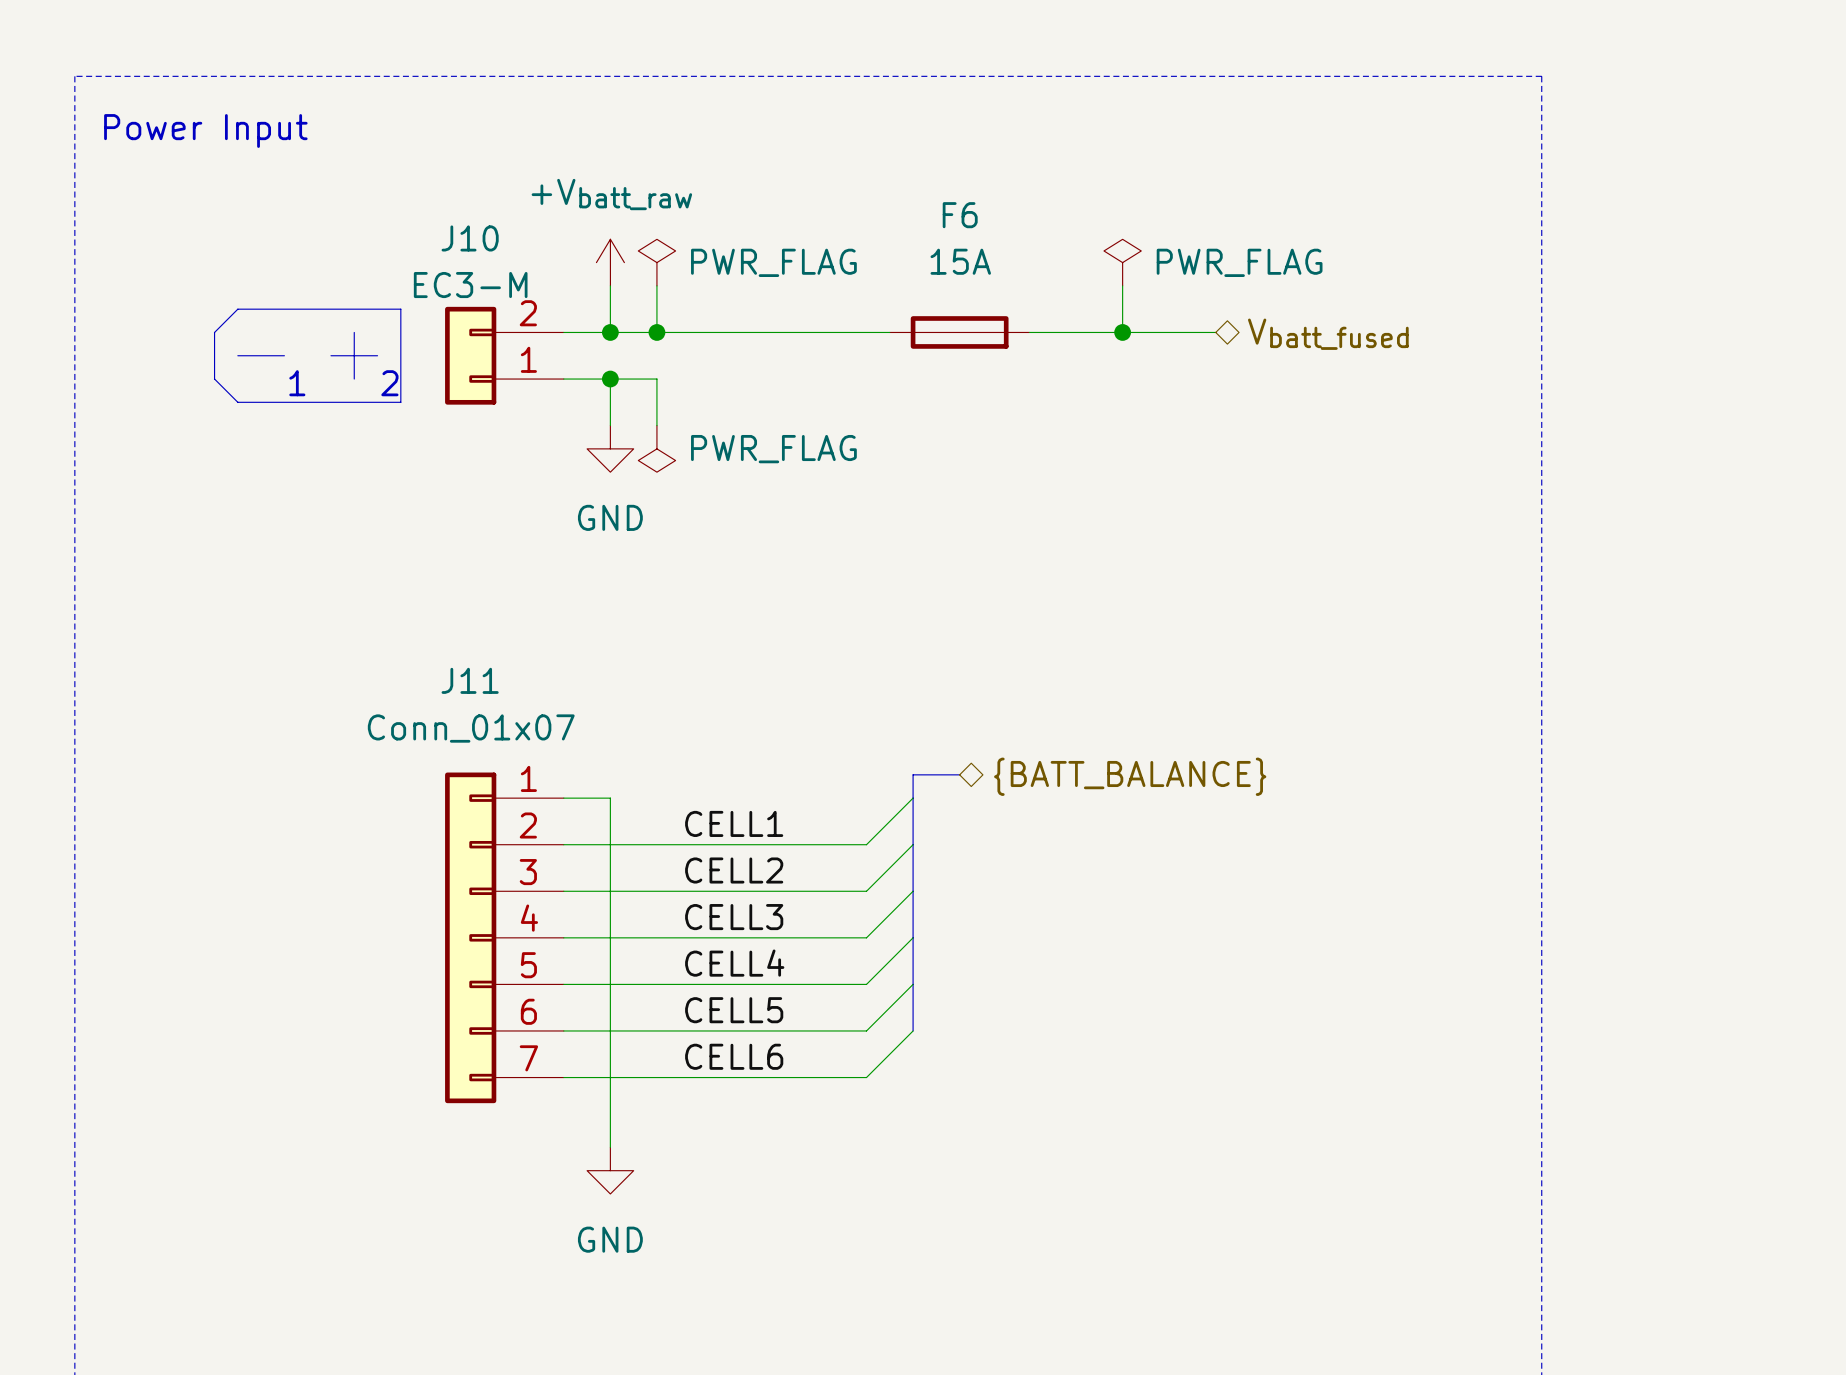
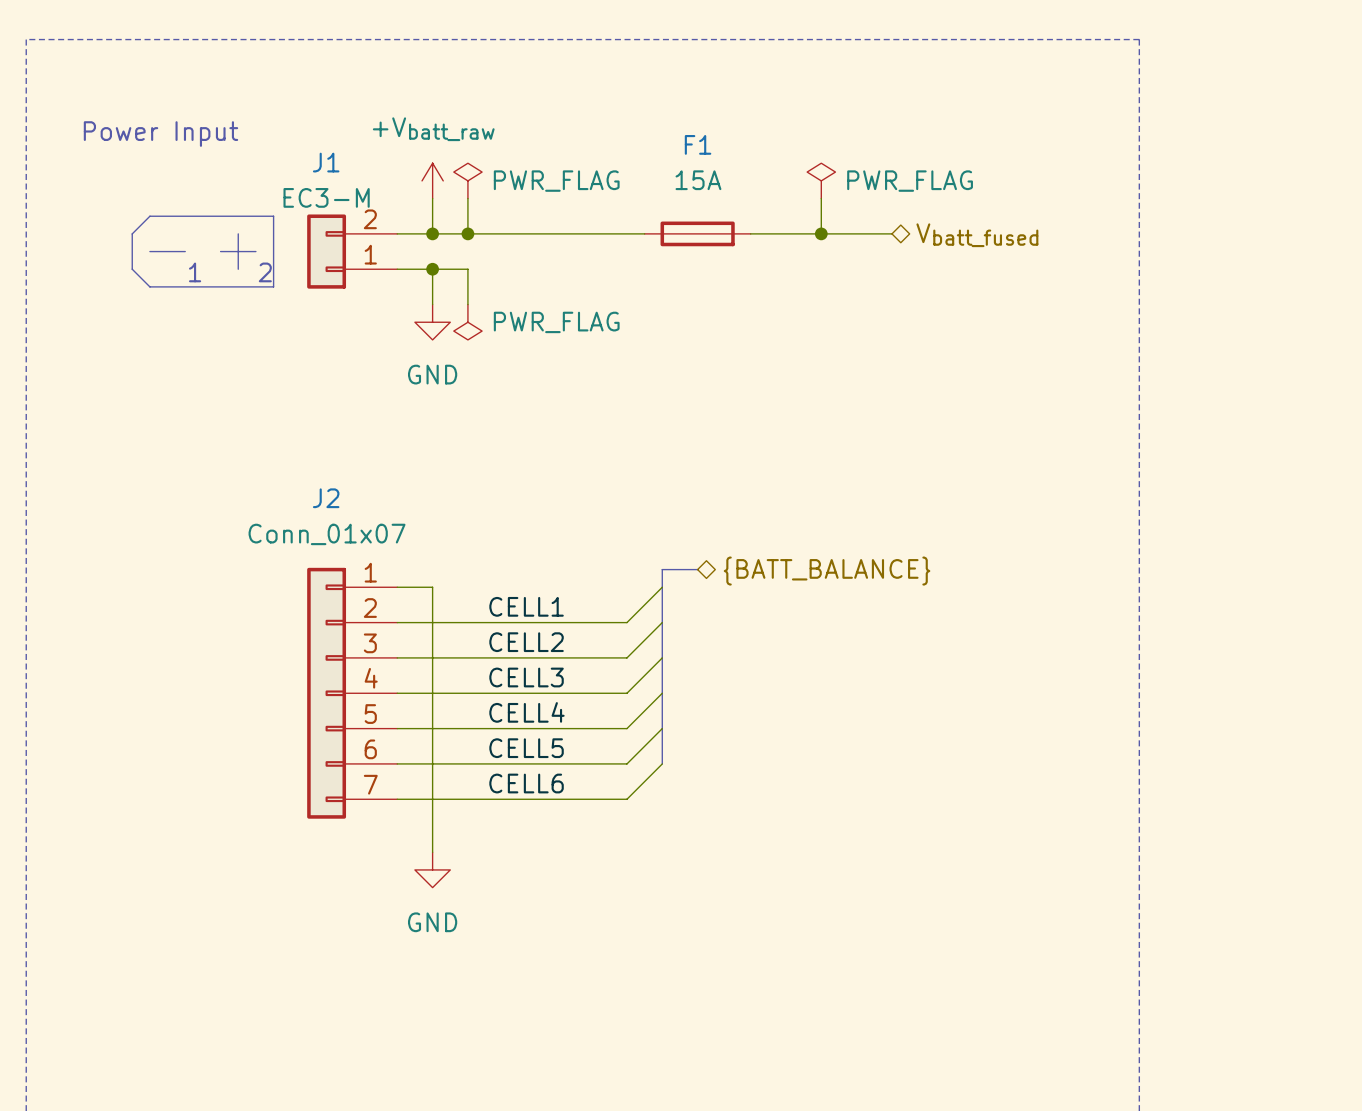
text position: Power Input (205, 131) -> Power Input (160, 134)
F6 name: F6 (960, 215) -> F1 (698, 144)
J10 name: J10 (470, 238) -> J1 (326, 162)
J11 name: J11 (470, 680) -> J2 (326, 498)

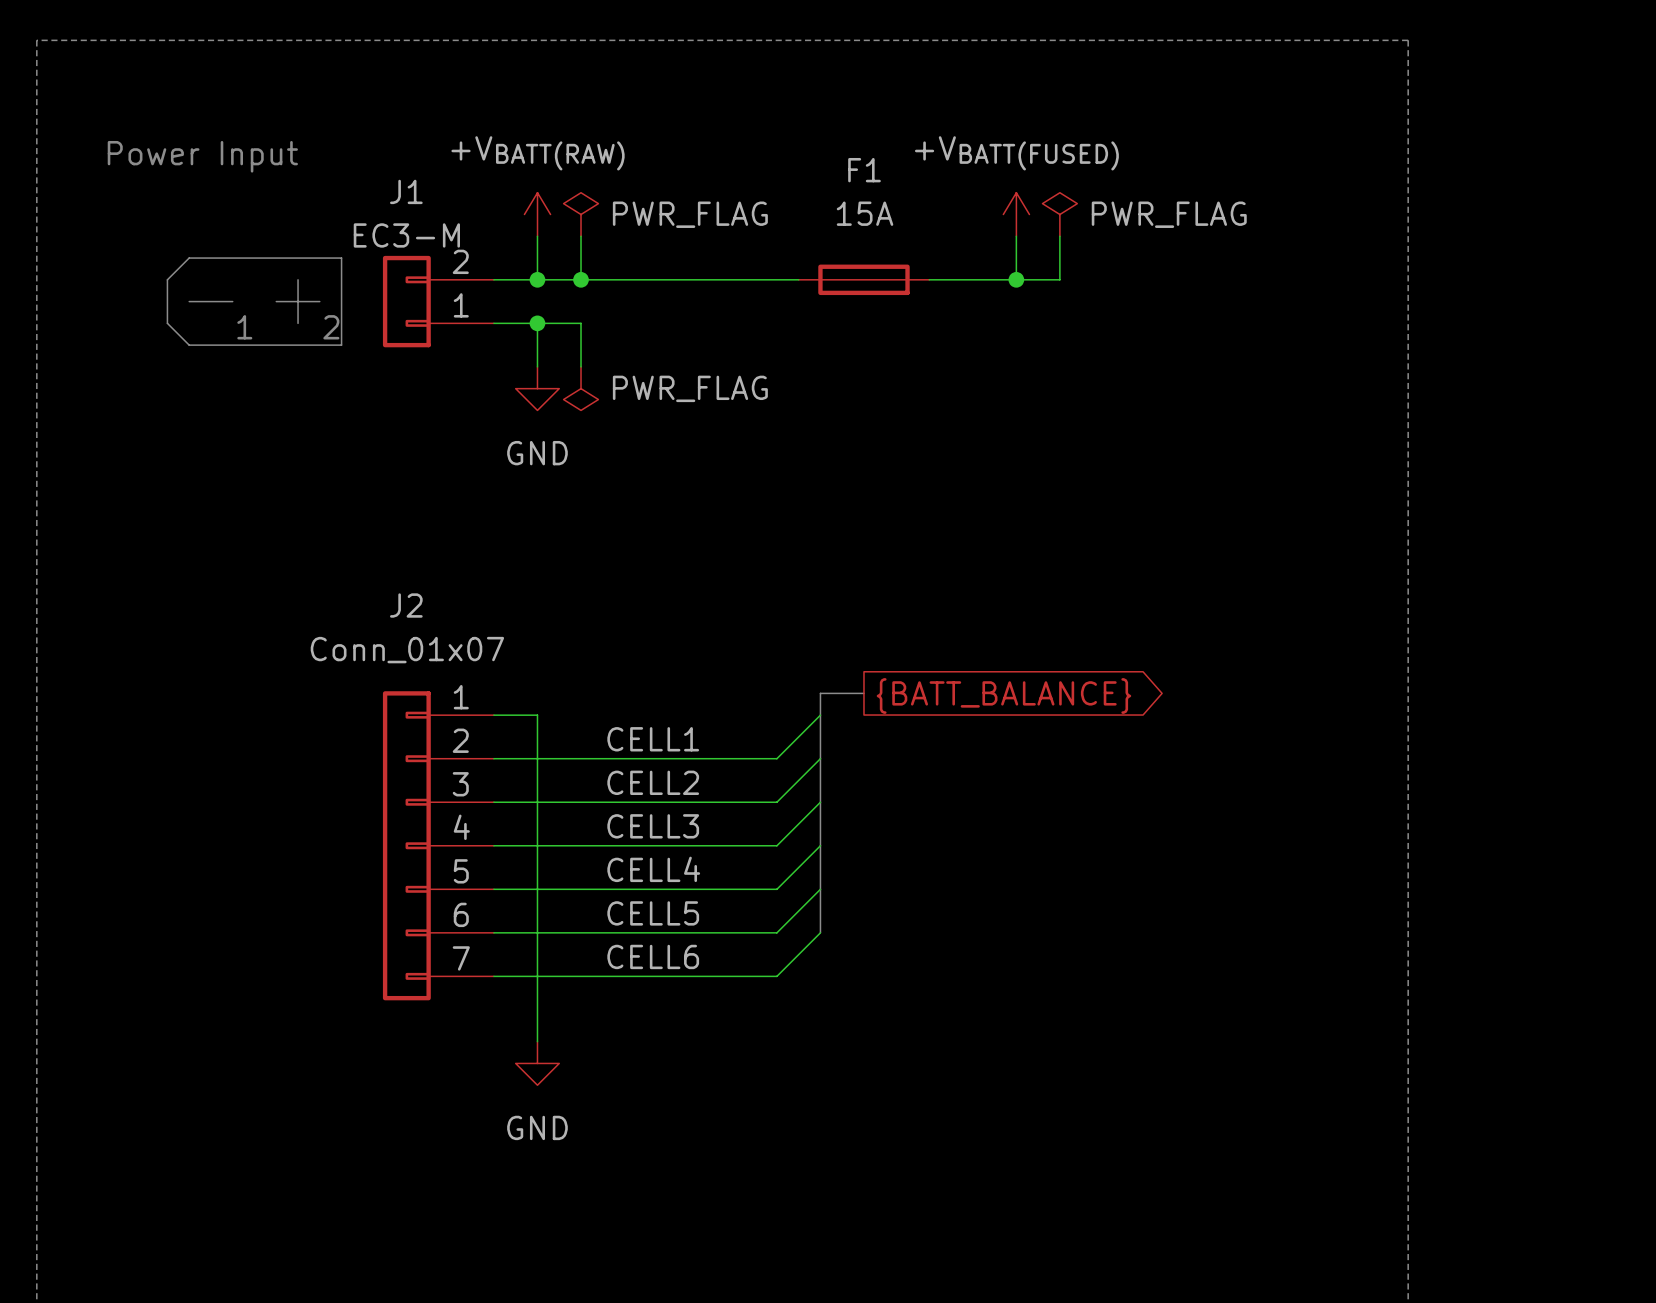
power symbol: +Vbatt_raw (432, 180) -> +VBATT(RAW) (537, 214)
power symbol: PWR_FLAG (821, 180) -> +VBATT(FUSED) (1016, 214)
power symbol: none -> PWR_FLAG (1059, 214)
wire: (856, 233) (891, 233) -> (1059, 279) (1059, 236)
hierarchical label: Vbatt_fused (977, 235) -> none
global label: none -> {BATT_BALANCE} (1003, 695)
hierarchical label: {BATT_BALANCE} (827, 571) -> none

